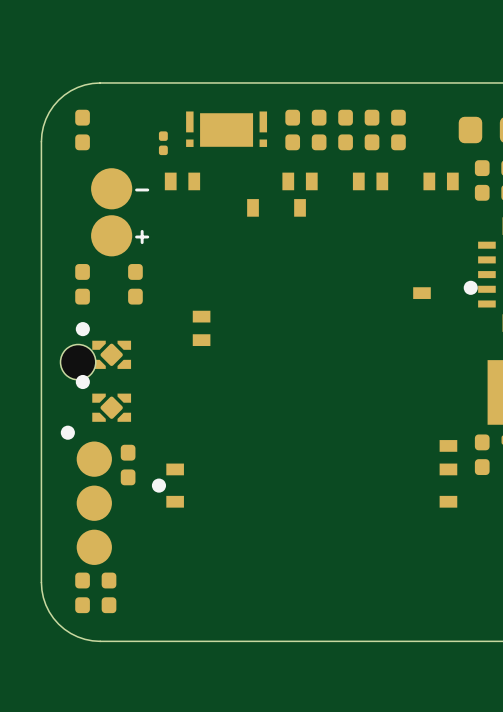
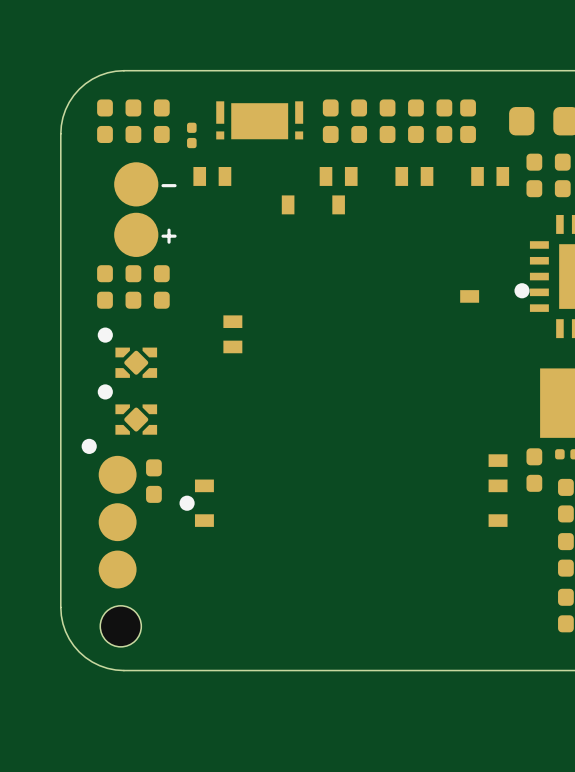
part: none -> (133, 121)
part: none -> (161, 121)
part: none -> (468, 121)
part: none -> (133, 286)
part: (78, 362) -> none
part: (82, 592) -> none
part: (109, 592) -> none
part: none -> (120, 626)

